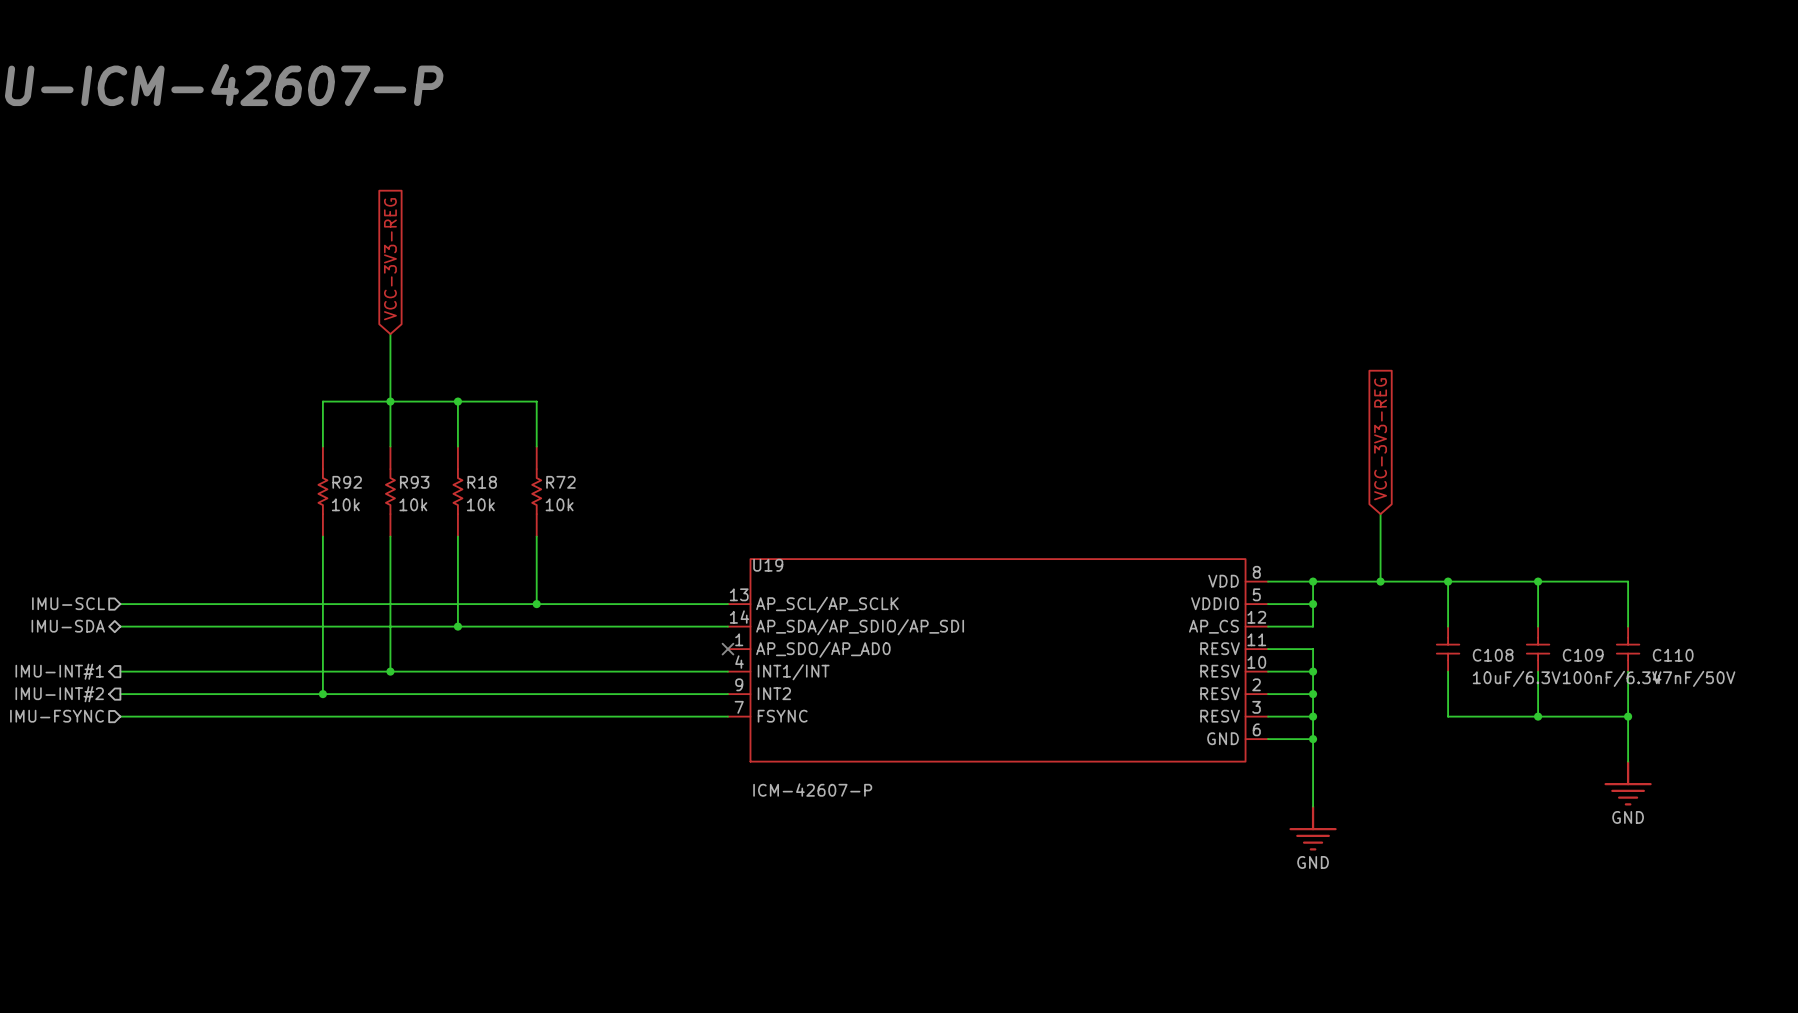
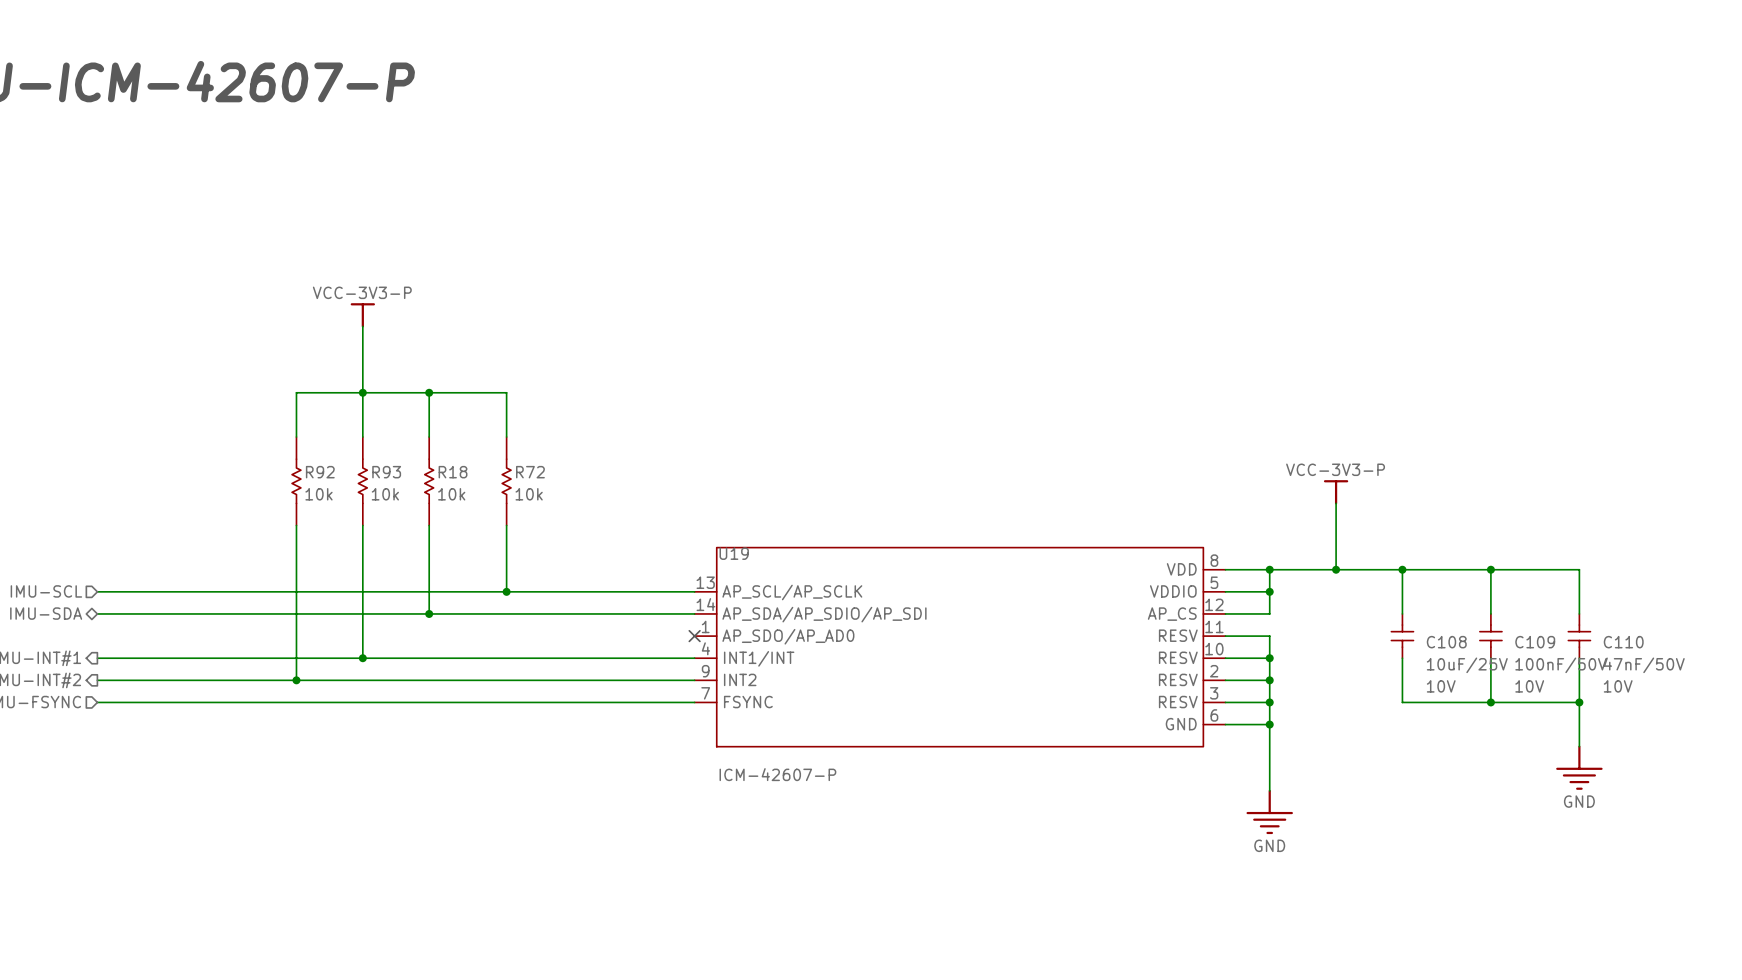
global label: VCC-3V3-REG (390, 259) -> none
power symbol: none -> VCC-3V3-P (362, 315)
global label: VCC-3V3-REG (1380, 439) -> none
power symbol: none -> VCC-3V3-P (1336, 492)
C108 value: 10uF/6.3V (1516, 678) -> 10uF/25V (1467, 665)
C109 value: 100nF/6.3V (1612, 678) -> 100nF/50V (1561, 665)
C108 text: none -> 10V (1441, 686)
C109 text: none -> 10V (1529, 686)
C110 text: none -> 10V (1618, 686)

